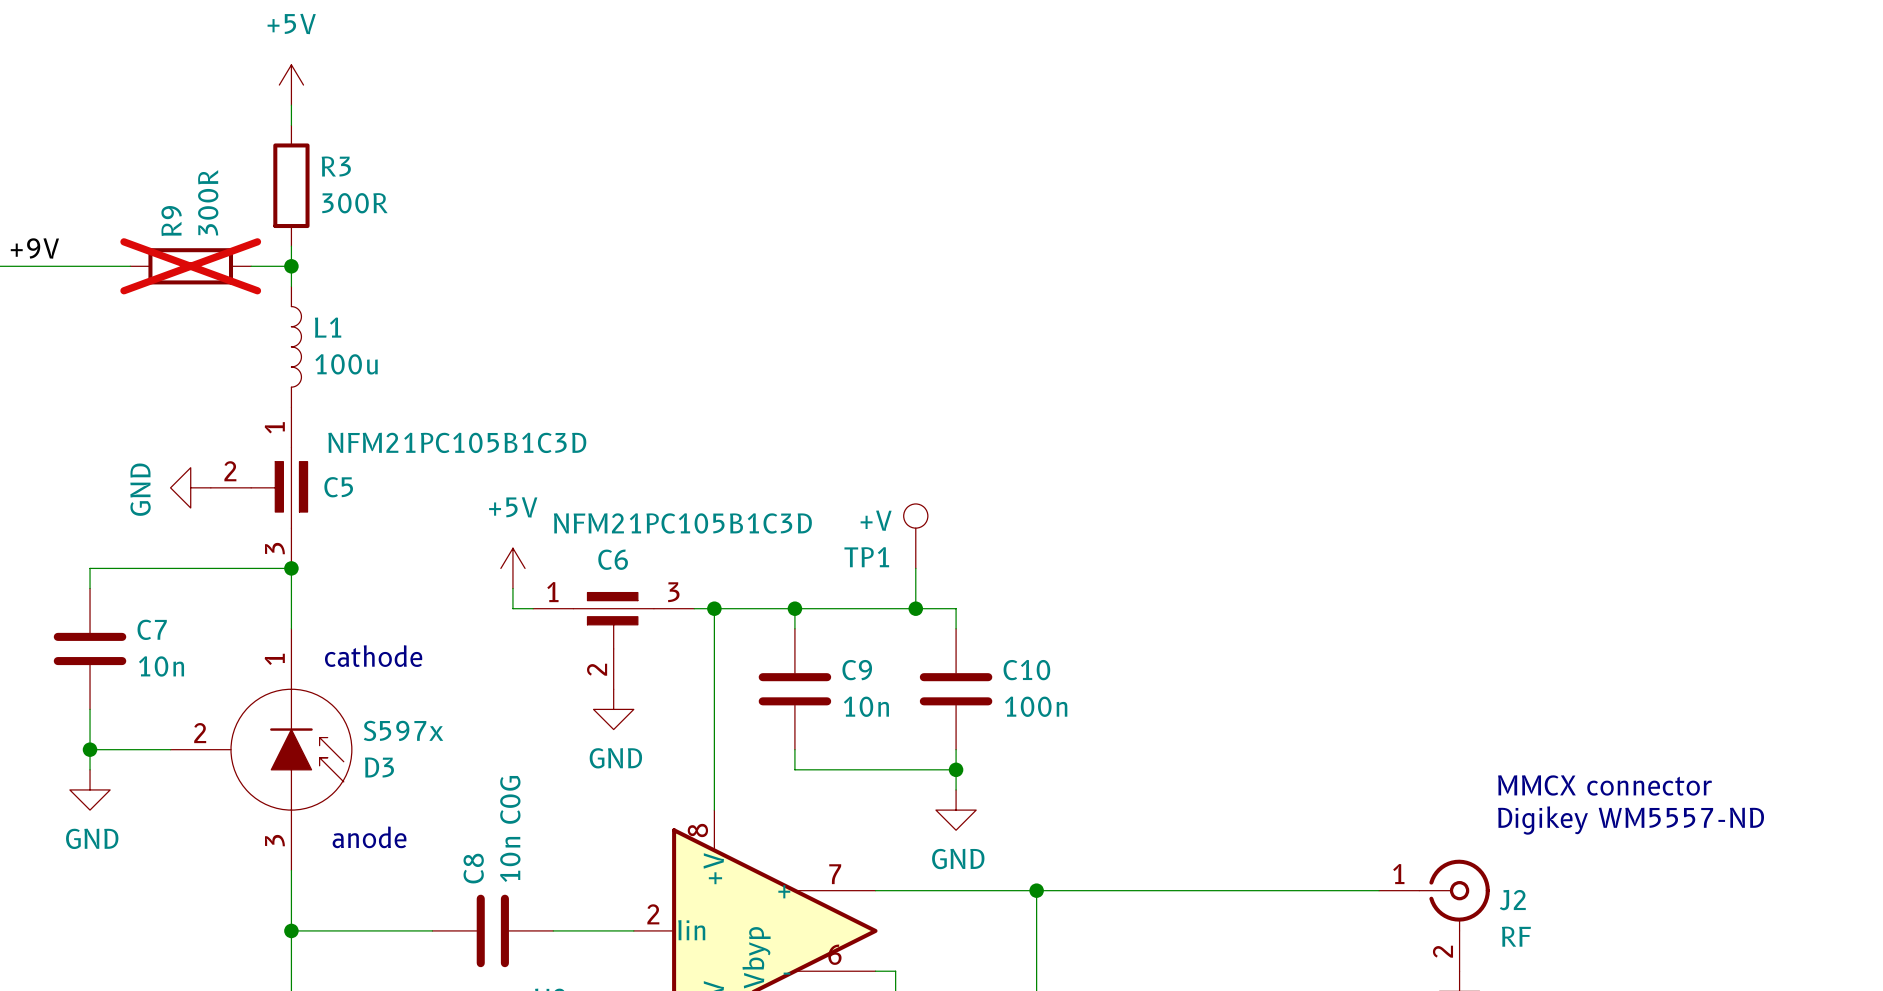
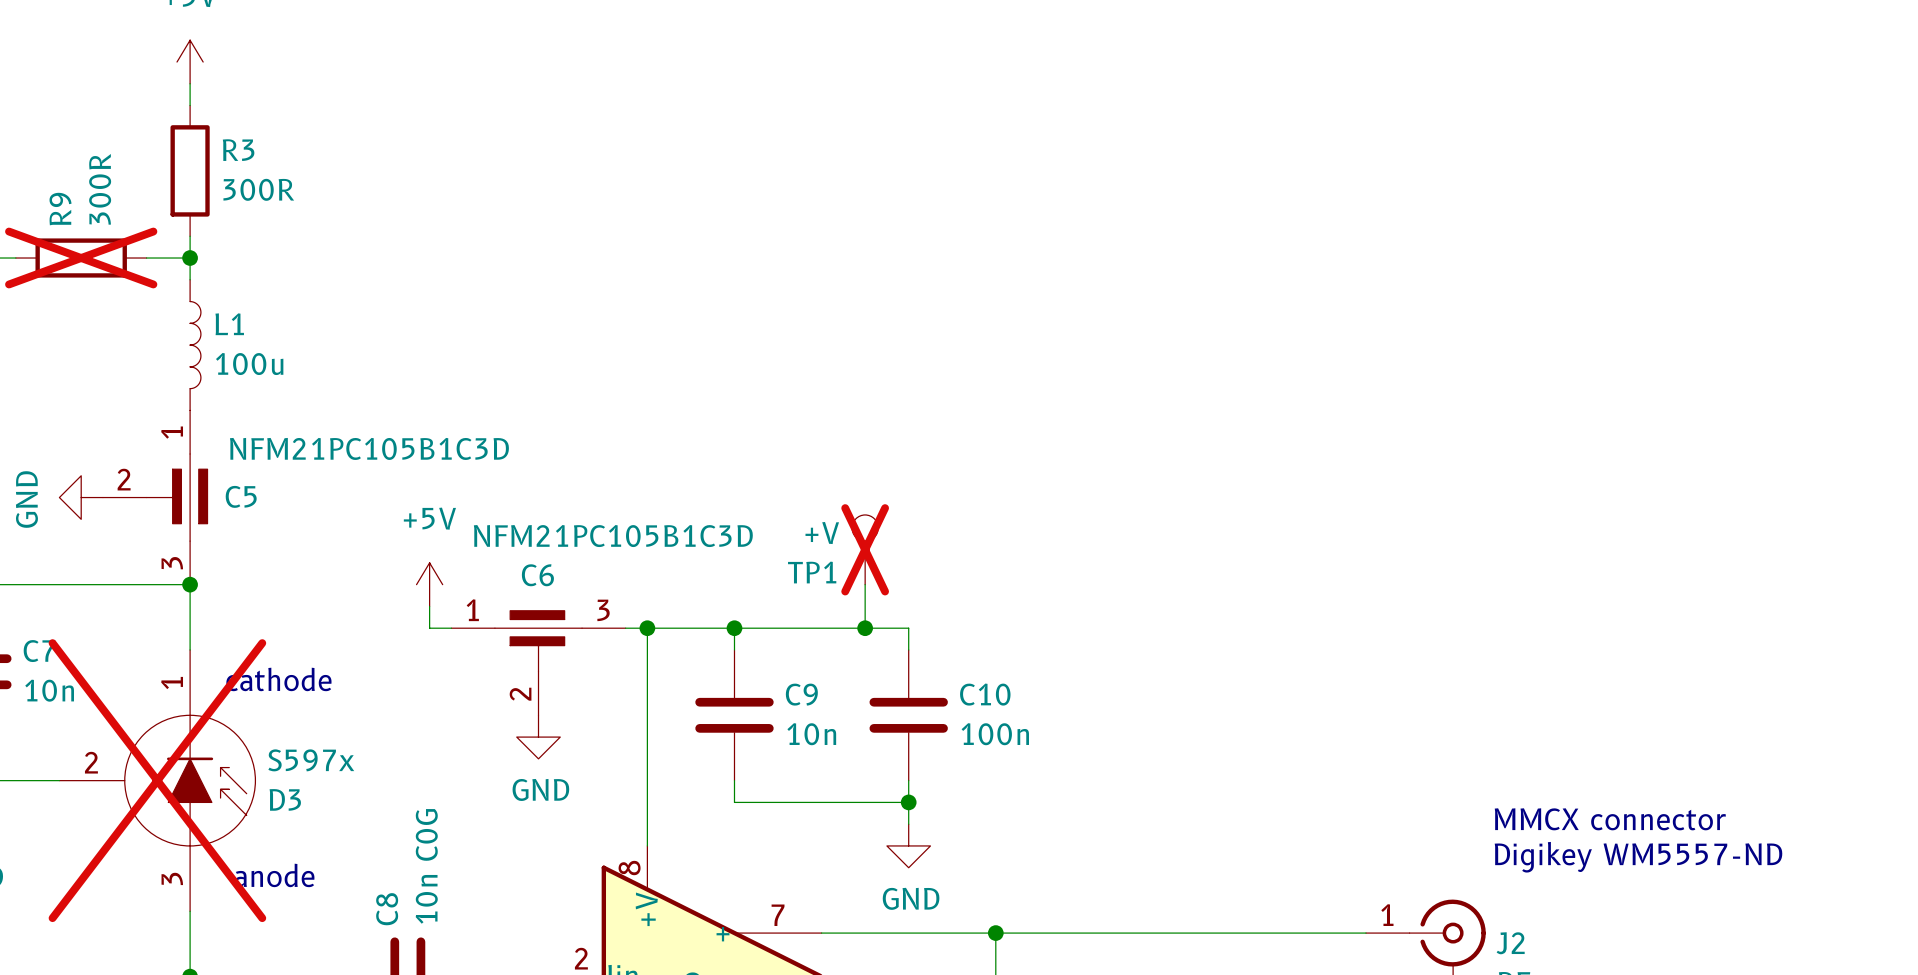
TP1 do-not-place cross: none -> (865, 549)
D3 do-not-place cross: none -> (157, 780)

